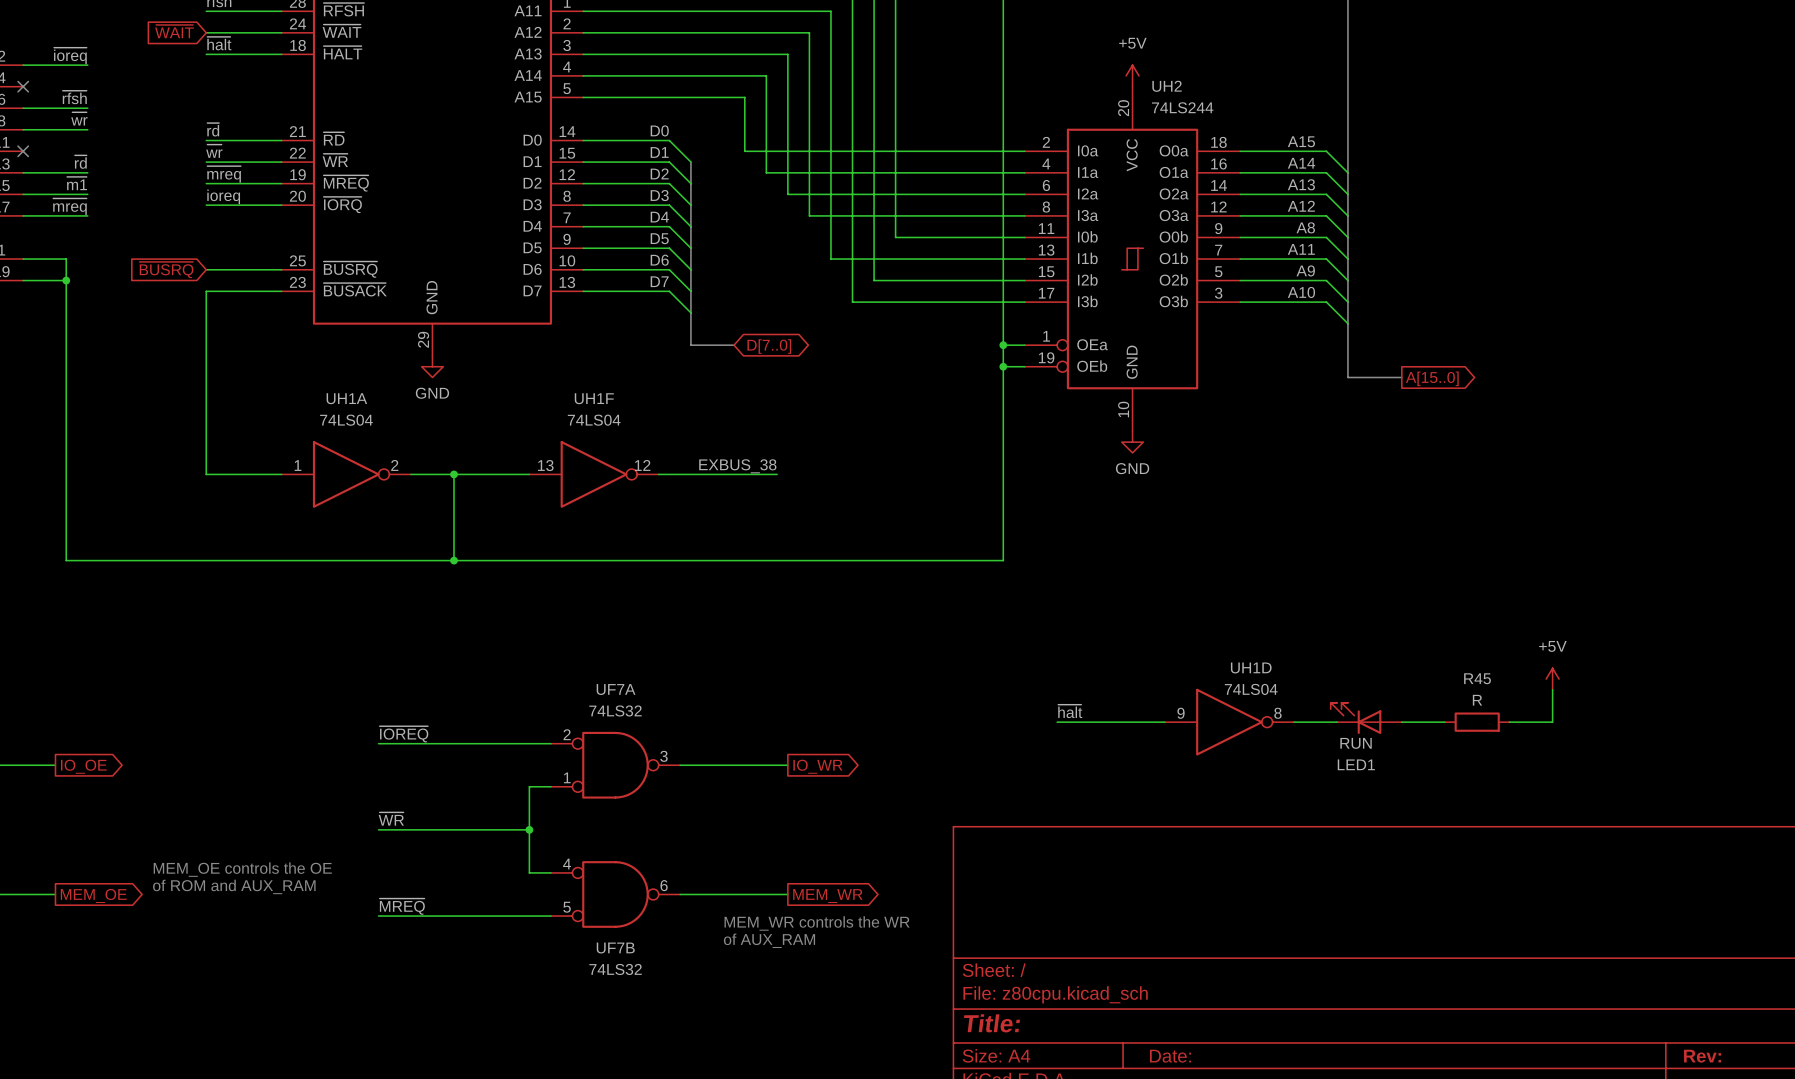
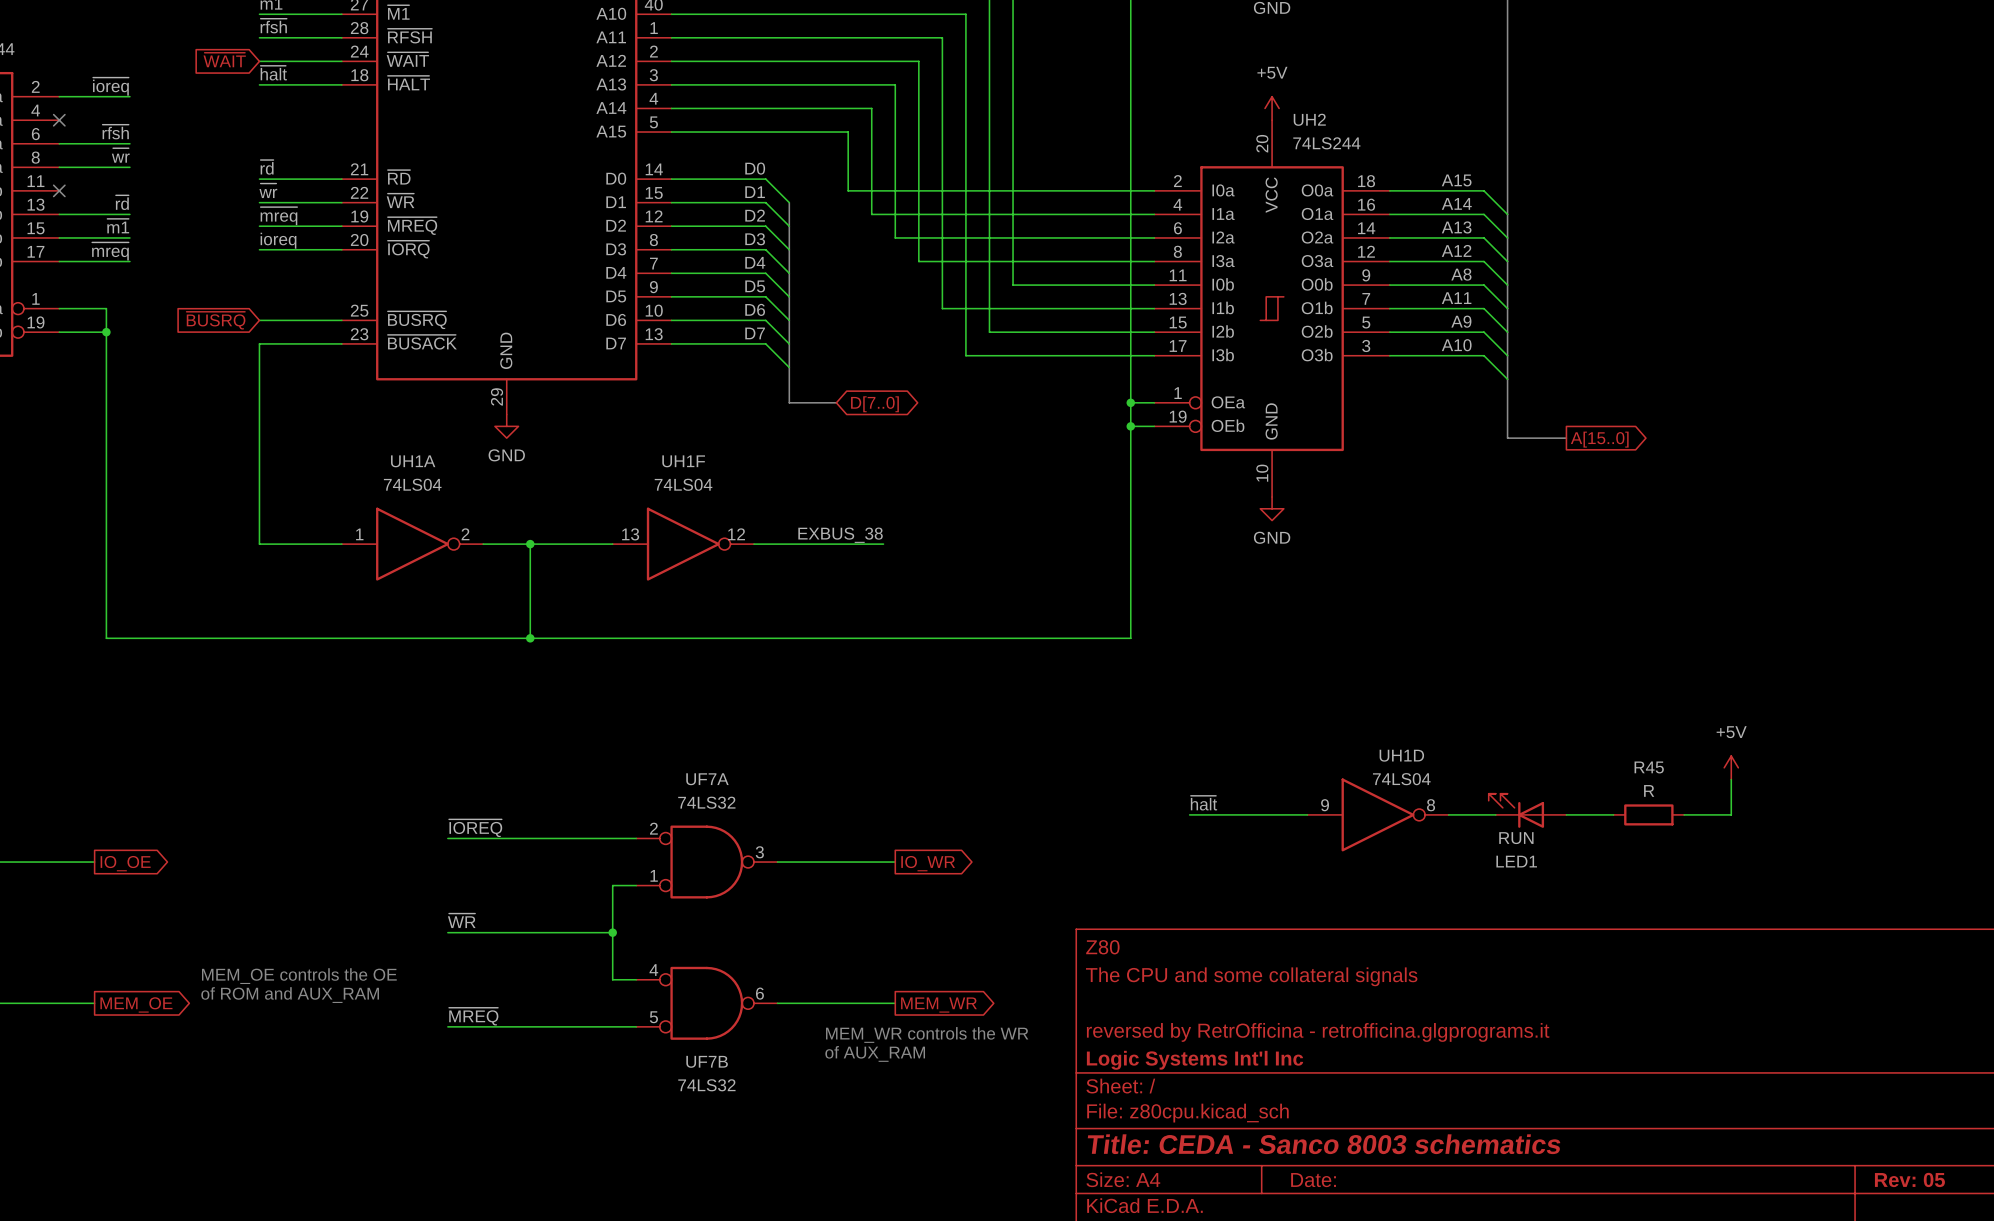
title block: none -> Z80 (1102, 947)
title block: none -> The CPU and some collateral signals (1251, 976)
title block: none -> reversed by RetrOfficina - retrofficina.glgprograms.it (1318, 1032)
title block: none -> Logic Systems Int'l Inc (1195, 1060)
title block: Title: (991, 1023) -> Title: CEDA - Sanco 8003 schematics (1324, 1144)
title block: Rev: (1702, 1056) -> Rev: 05 (1909, 1179)

